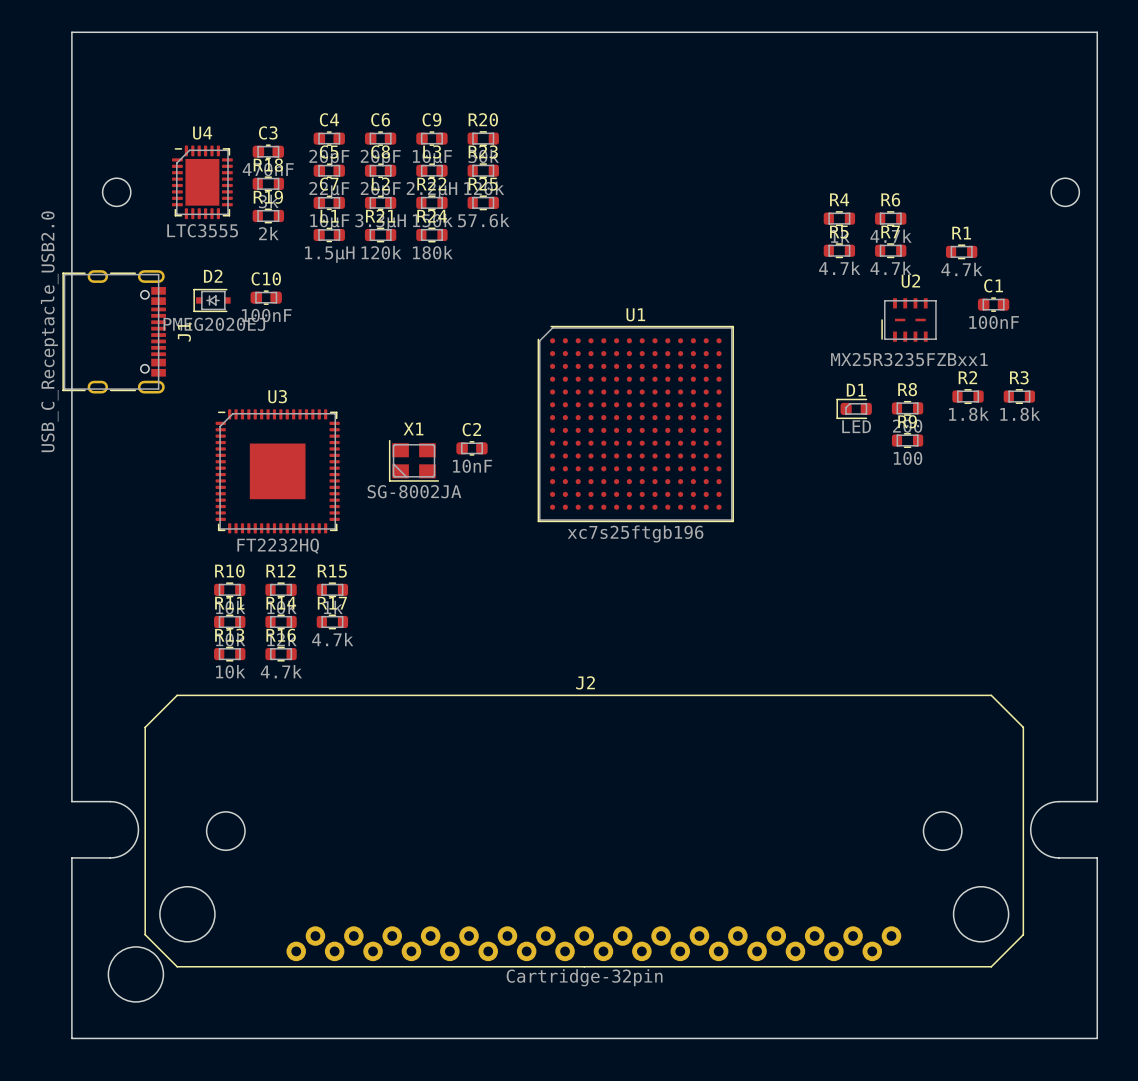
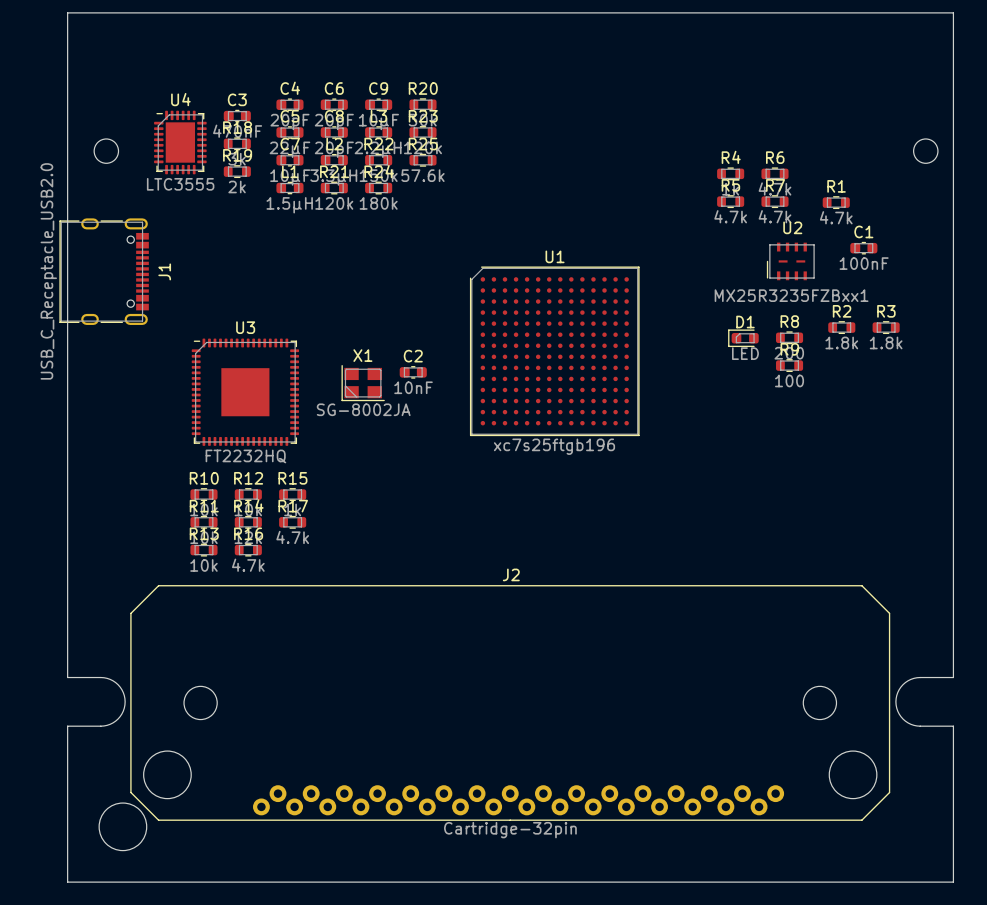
C10: 100nF (266, 297) -> none
D2: PMEG2020EJ (212, 300) -> none

